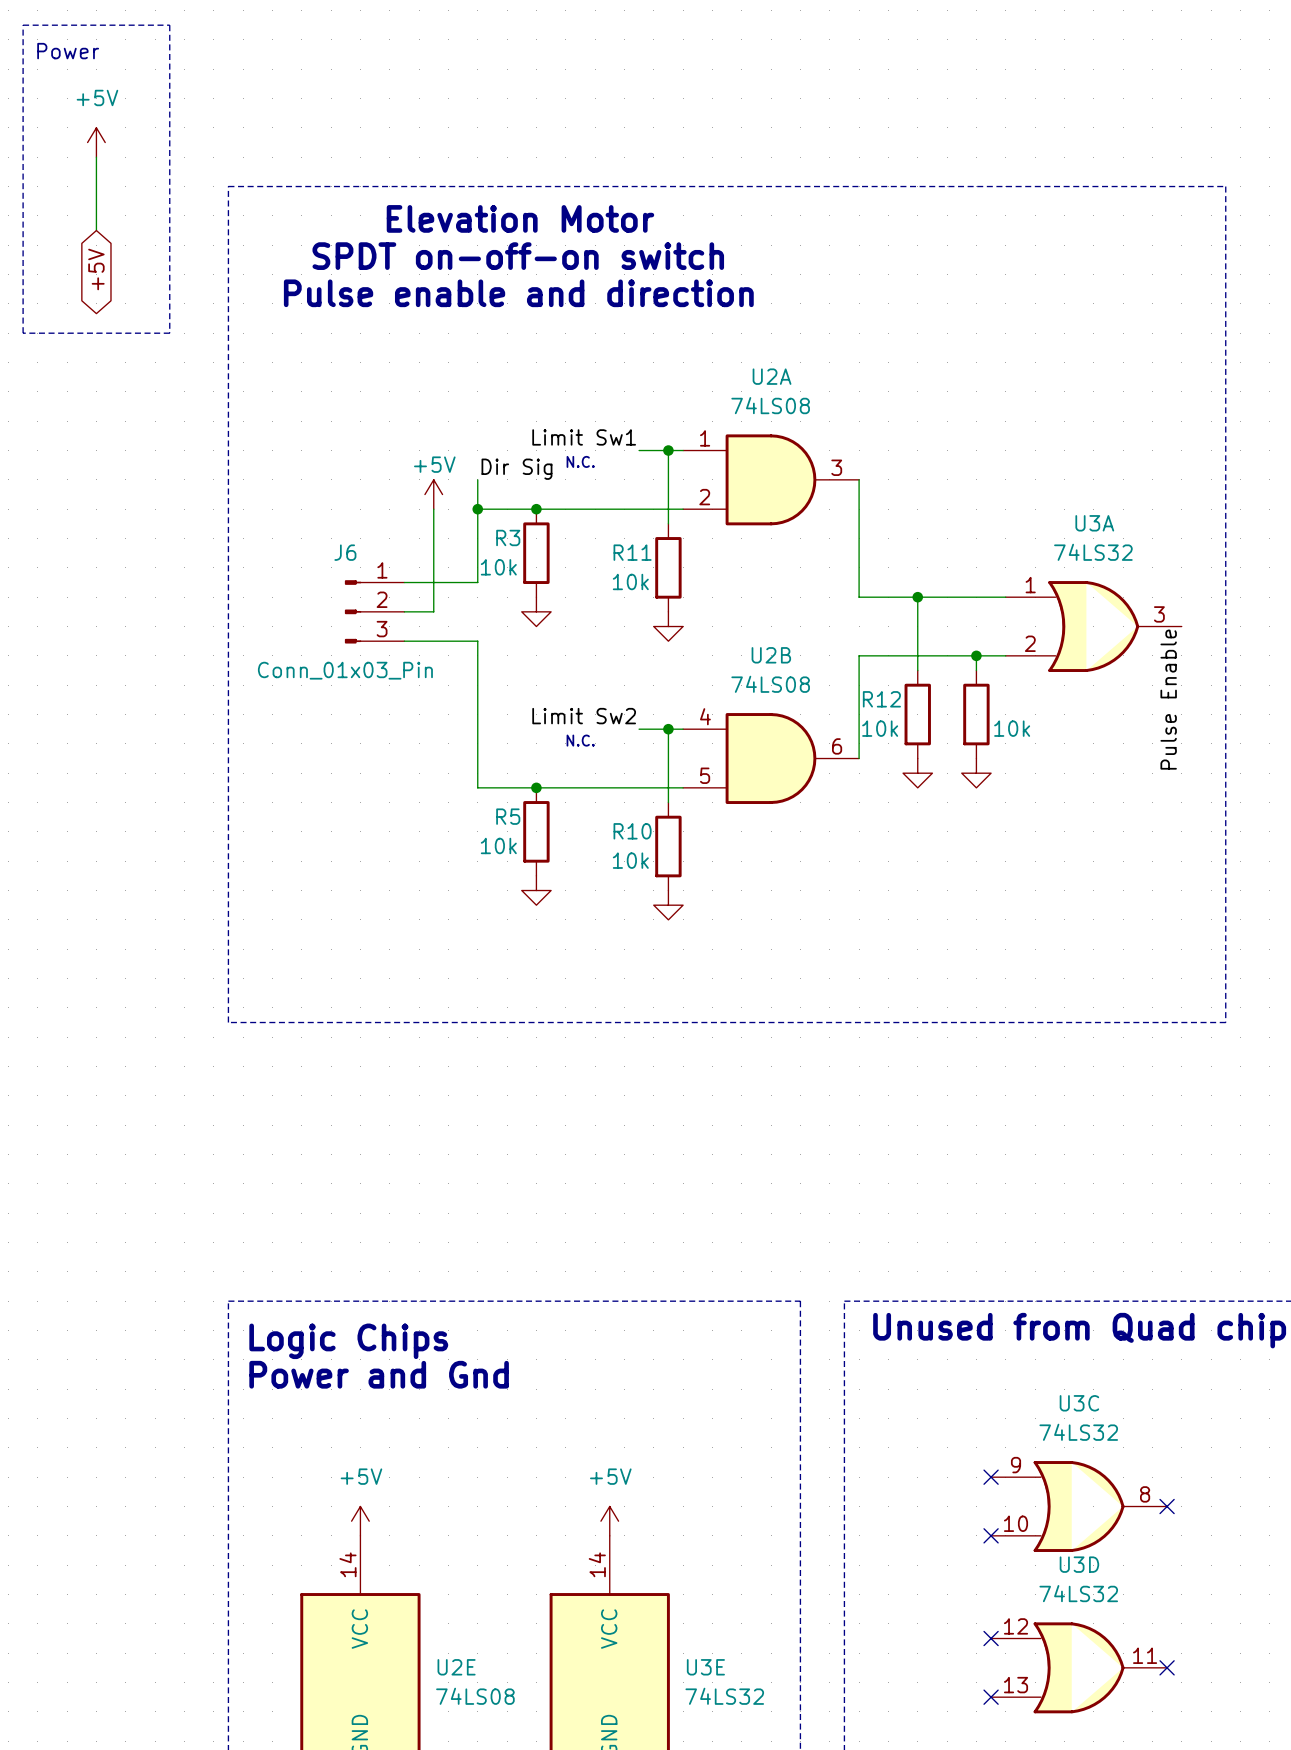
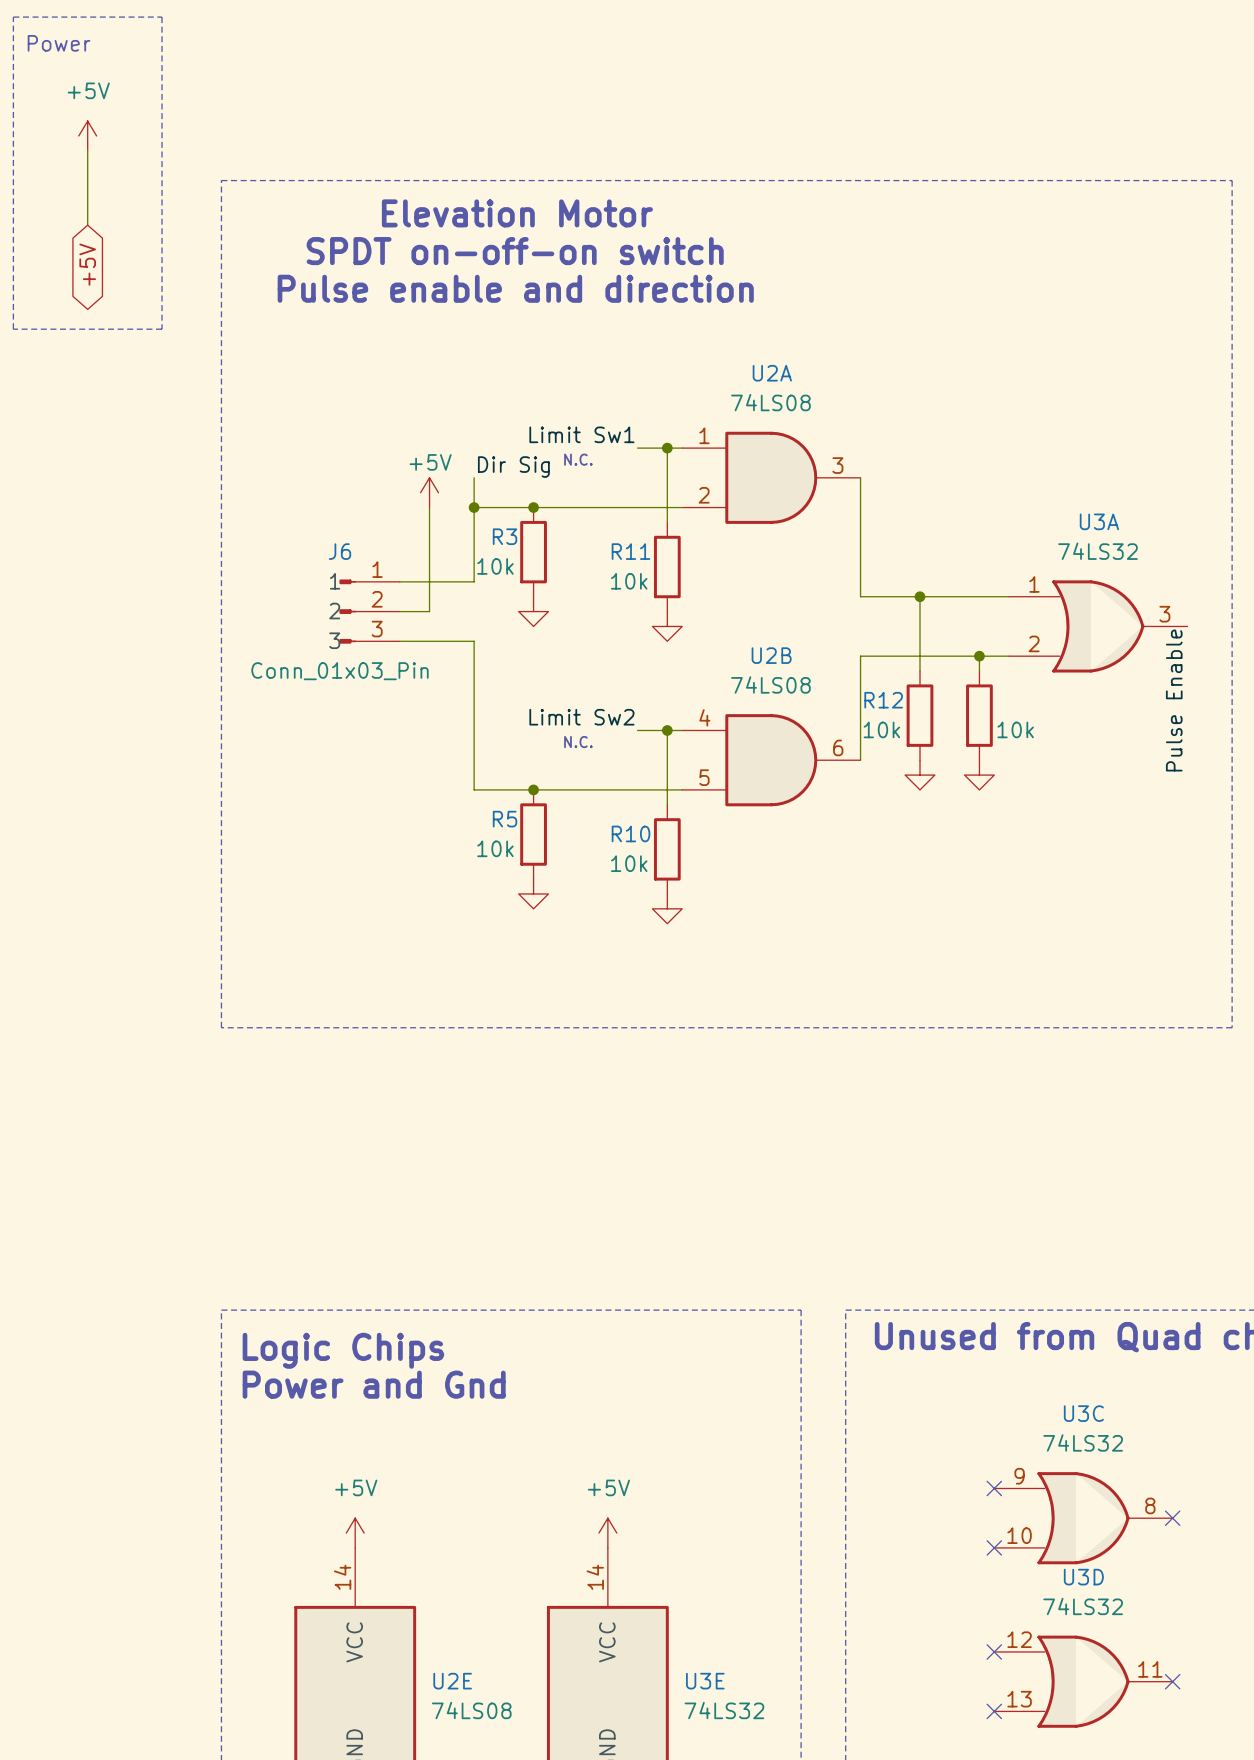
J6 pin name: none -> 1 (335, 581)
J6 pin name: none -> 2 (334, 611)
J6 pin name: none -> 3 (334, 640)

